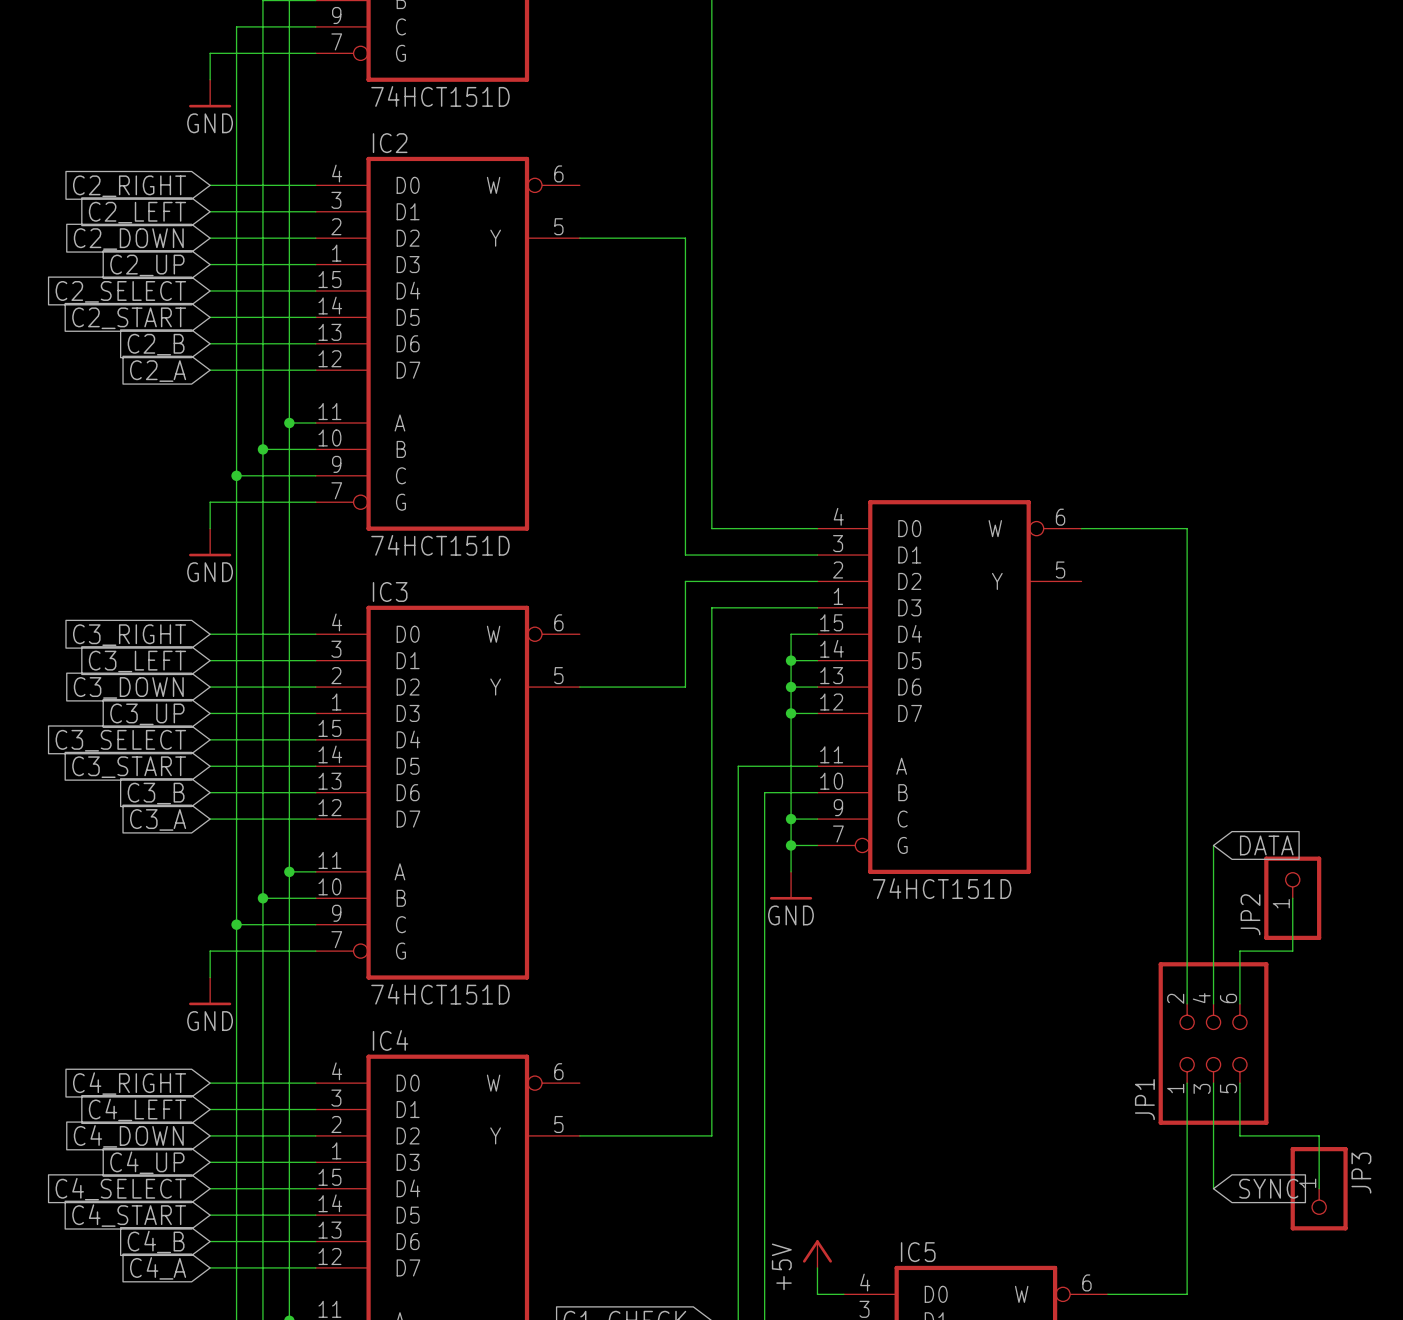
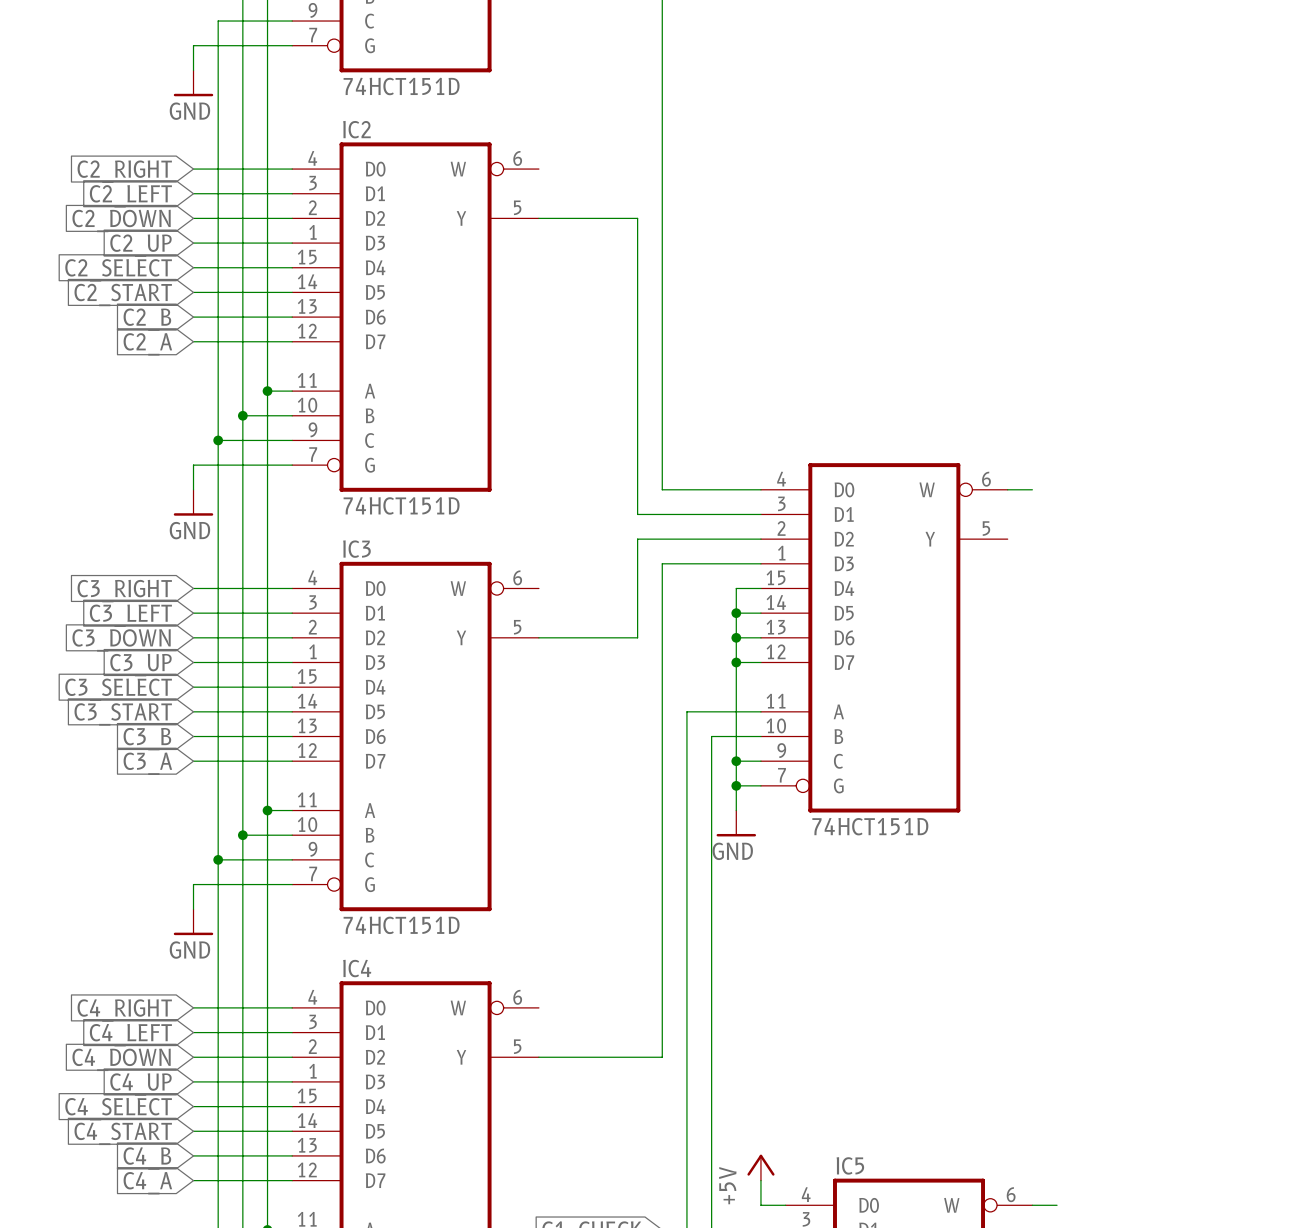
wire: (1107, 528) (1187, 528) (1187, 1003) -> none
wire: (1213, 845) (1213, 1003) -> none
global label: DATA (1266, 845) -> none
wire: (1292, 898) (1292, 951) (1239, 951) (1239, 1003) -> none
JP2: (1292, 898) -> none
JP1: (1213, 1043) -> none
wire: (1187, 1083) (1187, 1294) (1134, 1294) -> none
wire: (1213, 1083) (1213, 1188) -> none
wire: (1239, 1083) (1239, 1135) (1319, 1135) (1319, 1188) -> none
global label: SYNC (1268, 1188) -> none
JP3: (1319, 1188) -> none

